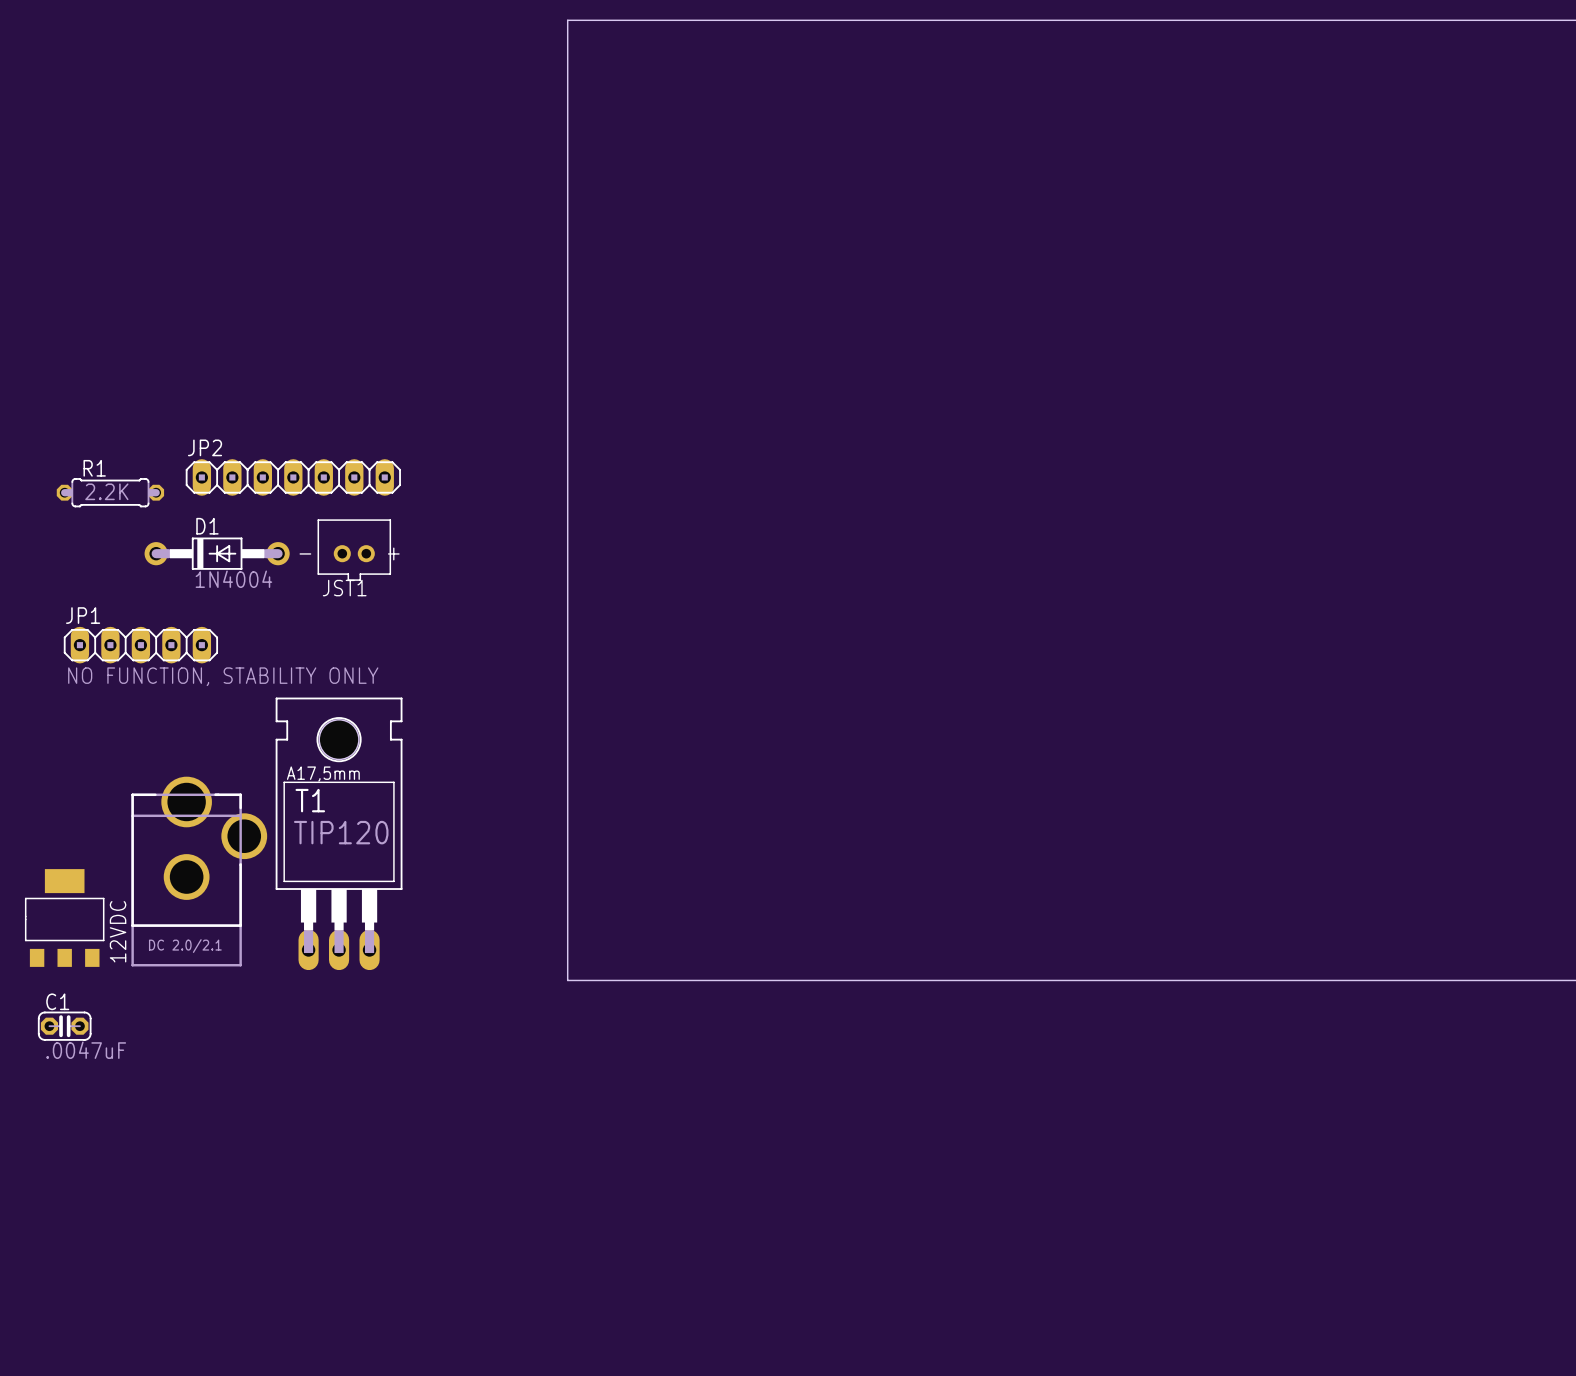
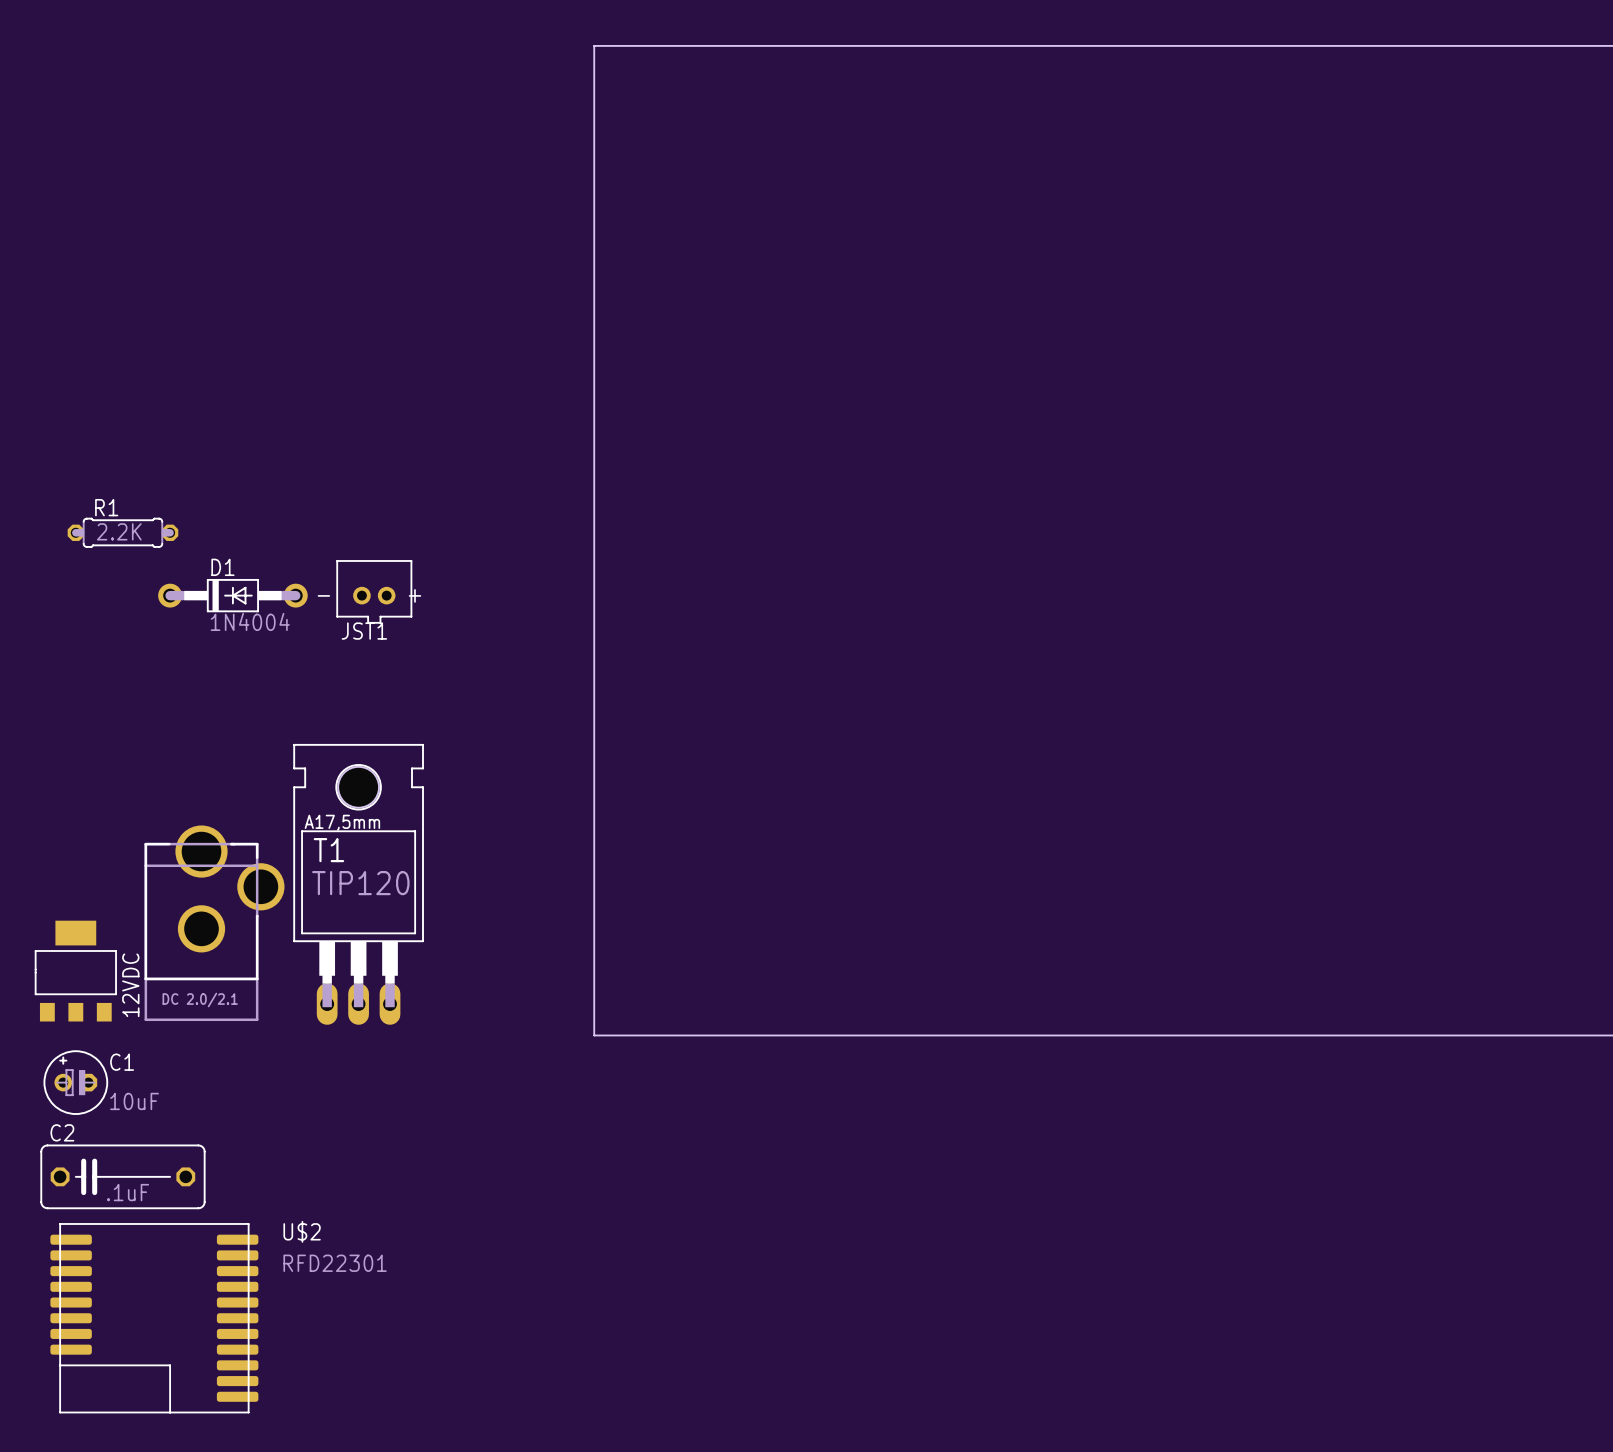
JP2: (293, 477) -> none
JP1: NO FUNCTION, STABILITY ONLY (140, 645) -> none
C1 name position: C1 (57, 1001) -> C1 (122, 1062)
C1 footprint: [37, 1011, 92, 1041] -> [43, 1050, 109, 1115]
C1 value: .0047uF (86, 1050) -> 10uF (134, 1101)
C2: none -> .1uF (122, 1176)
U$2: none -> RFD22301 (154, 1318)

